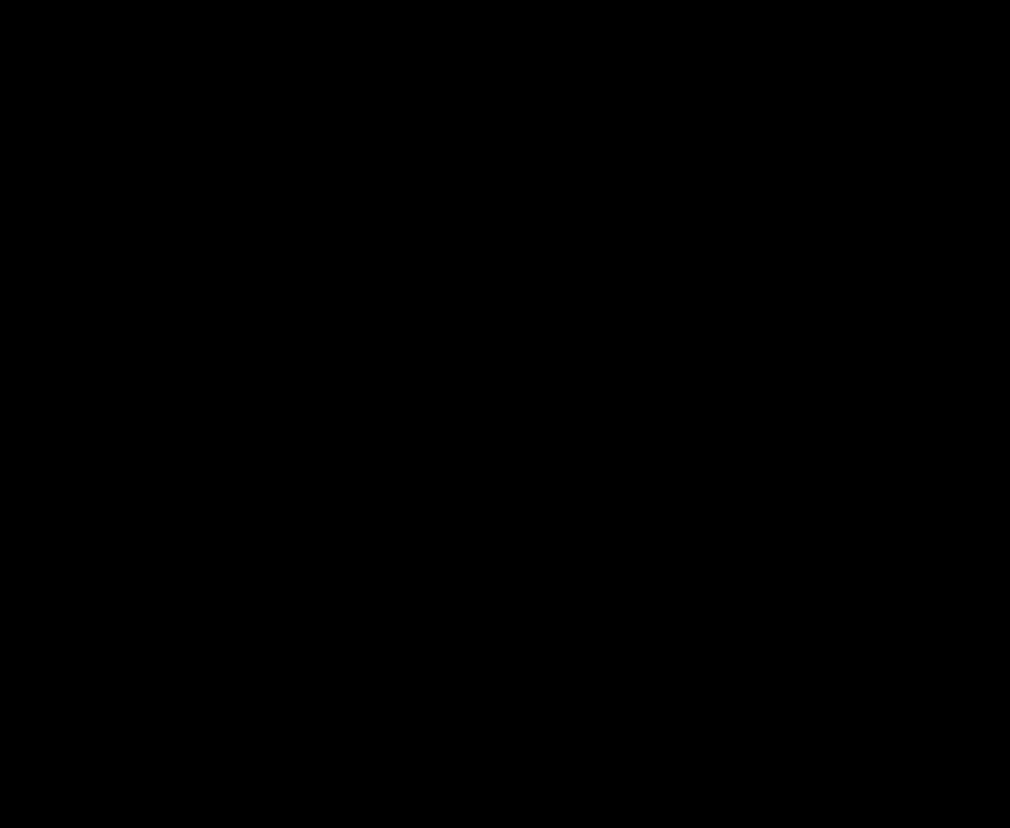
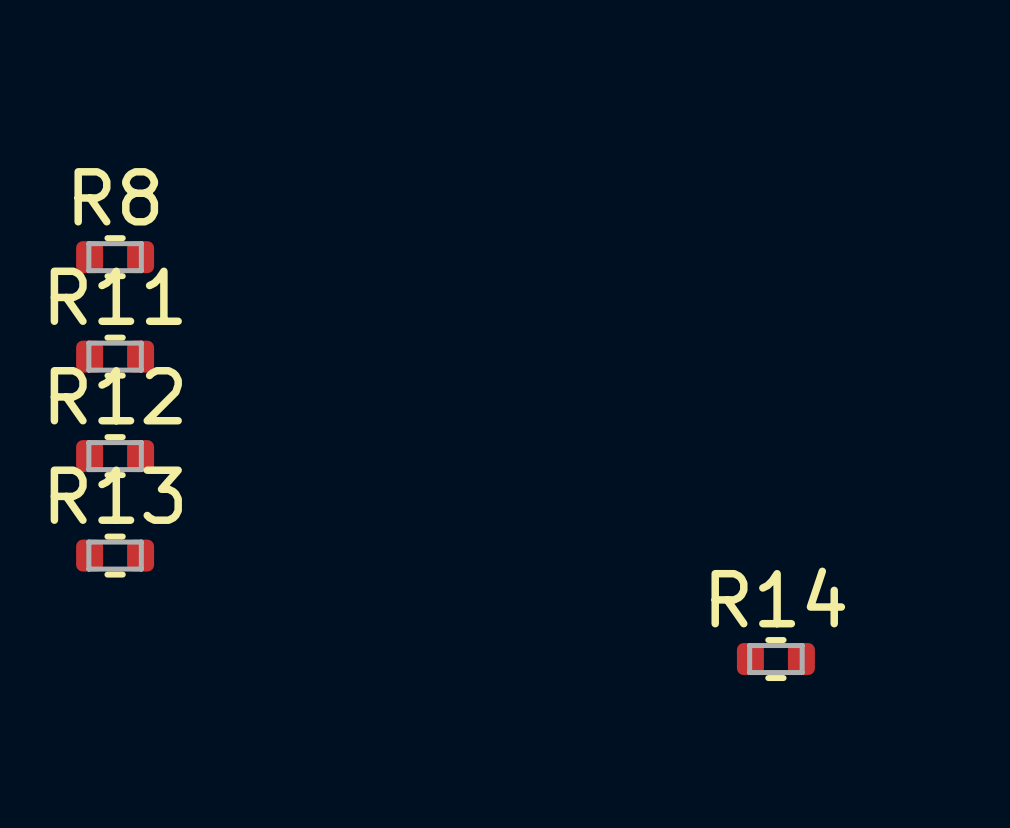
R8: none -> (115, 257)
R11: none -> (115, 356)
R12: none -> (115, 456)
R13: none -> (115, 555)
R14: none -> (775, 659)

